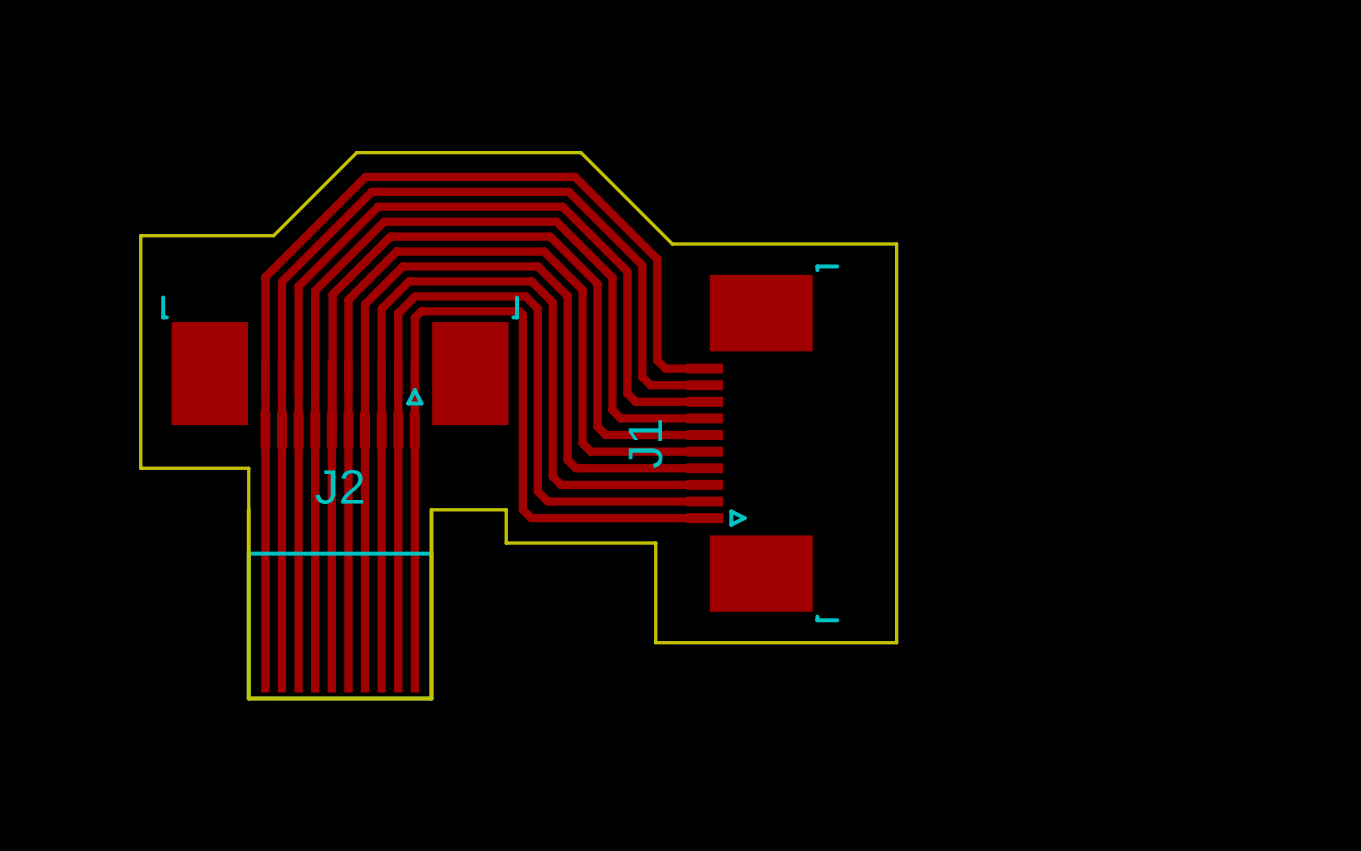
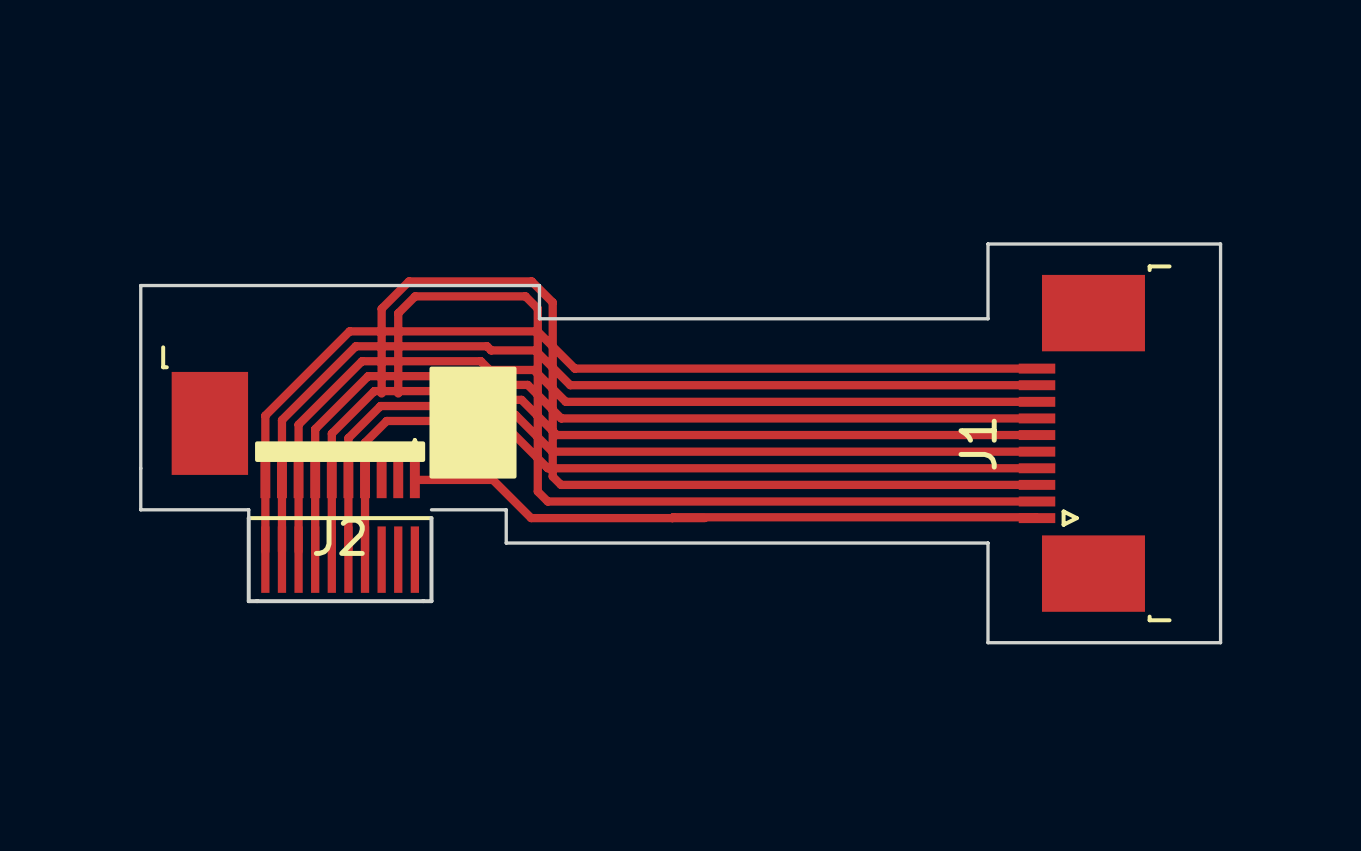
board edge: (140, 285) (140, 235) (273, 235) (356, 152) (580, 152) (672, 244) (896, 244) (896, 642) (655, 642) (655, 543) -> (140, 285) (539, 285) (539, 318) (987, 318) (987, 244) (1220, 244) (1220, 642) (987, 642) (987, 543) (655, 543)
J2 footprint: [161, 295, 520, 449] -> [161, 345, 517, 499]
part footprint: [246, 360, 434, 701] -> [246, 516, 434, 604]
track: (665, 368) (657, 360) (657, 259) (575, 176) (365, 176) (265, 277) (265, 393) -> (665, 368) (574, 368) (537, 331) (349, 331) (265, 415) (265, 551)
track: none -> (704, 368) (1037, 368)
track: (650, 385) (642, 376) (642, 265) (568, 191) (371, 191) (281, 281) (281, 393) -> (650, 385) (570, 385) (535, 350) (491, 350) (487, 346) (355, 346) (281, 420) (281, 551)
track: none -> (704, 385) (1037, 385)
track: (298, 393) (298, 286) (378, 206) (562, 206) (627, 271) (627, 393) (635, 401) -> (298, 551) (298, 424) (361, 361) (480, 361) (489, 369) (533, 369) (565, 401) (635, 401)
track: (315, 393) (315, 290) (384, 221) (556, 221) (612, 277) (612, 410) (620, 418) -> (315, 551) (315, 429) (368, 376) (472, 376) (481, 384) (527, 384) (561, 418) (620, 418)
track: (348, 393) (348, 299) (396, 251) (544, 251) (582, 290) (582, 443) (590, 451) -> (348, 551) (348, 438) (380, 406) (452, 406) (461, 414) (515, 414) (552, 451) (590, 451)
track: (365, 393) (365, 304) (402, 266) (537, 266) (567, 296) (567, 459) (575, 468) -> (365, 551) (365, 442) (386, 420) (439, 420) (448, 429) (509, 429) (547, 468) (575, 468)
track: (414, 393) (414, 317) (421, 311) (519, 311) (522, 314) (522, 509) -> (414, 479) (492, 479) (522, 509)
track: none -> (704, 401) (1037, 401)
track: none -> (704, 418) (1037, 418)
track: (331, 430) (332, 294) (390, 236) (550, 236) (597, 283) (597, 426) (605, 435) -> (331, 551) (331, 433) (374, 391) (464, 391) (473, 399) (521, 399) (556, 435) (605, 435)
track: none -> (704, 435) (1037, 435)
J1 position: (762, 443) -> (1095, 443)
track: none -> (704, 451) (1037, 451)
board edge: (140, 468) (248, 468) (248, 509) -> (140, 468) (140, 509) (248, 509) (248, 518)
track: none -> (704, 468) (1037, 468)
track: none -> (704, 484) (1037, 484)
track: none -> (704, 501) (1037, 501)
track: none -> (672, 518) (1037, 518)

